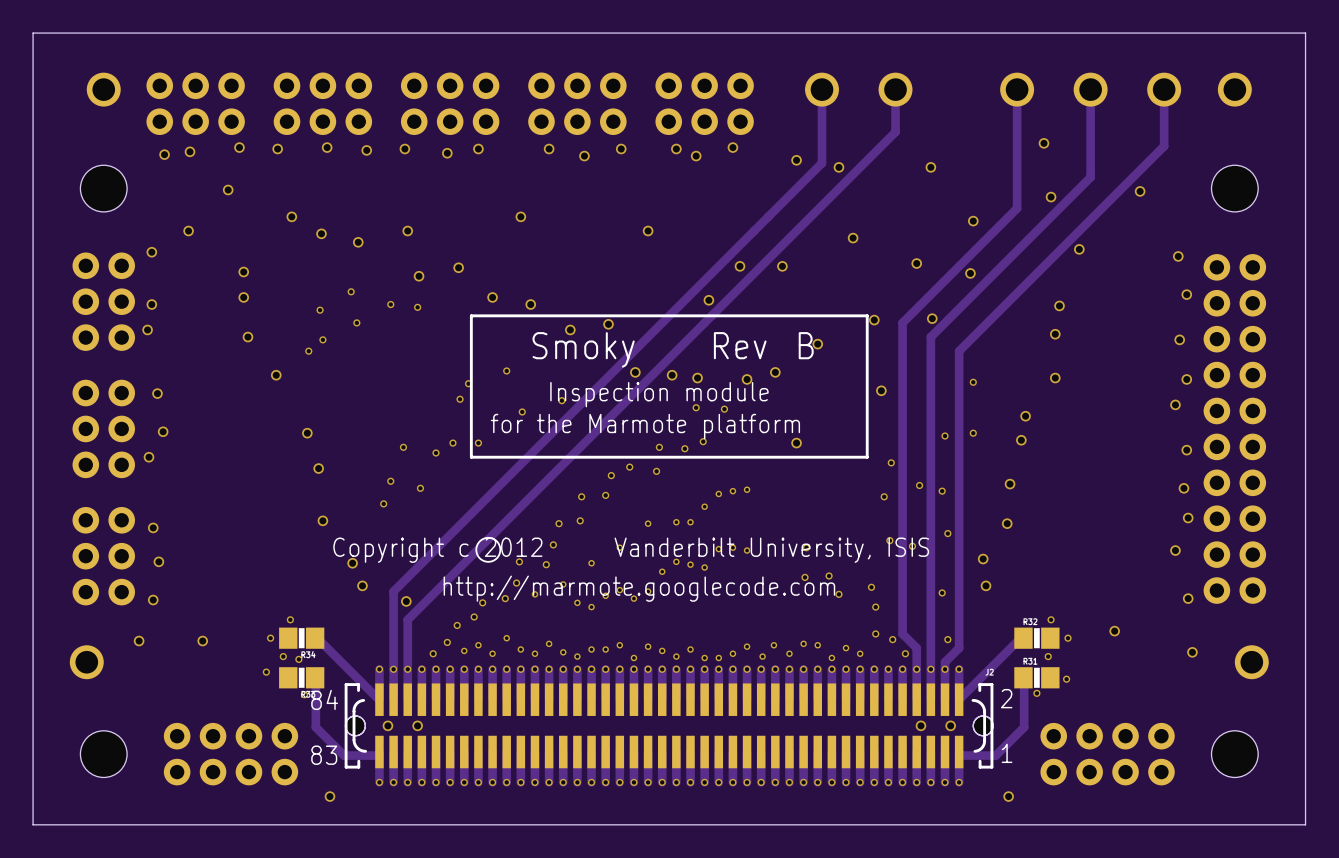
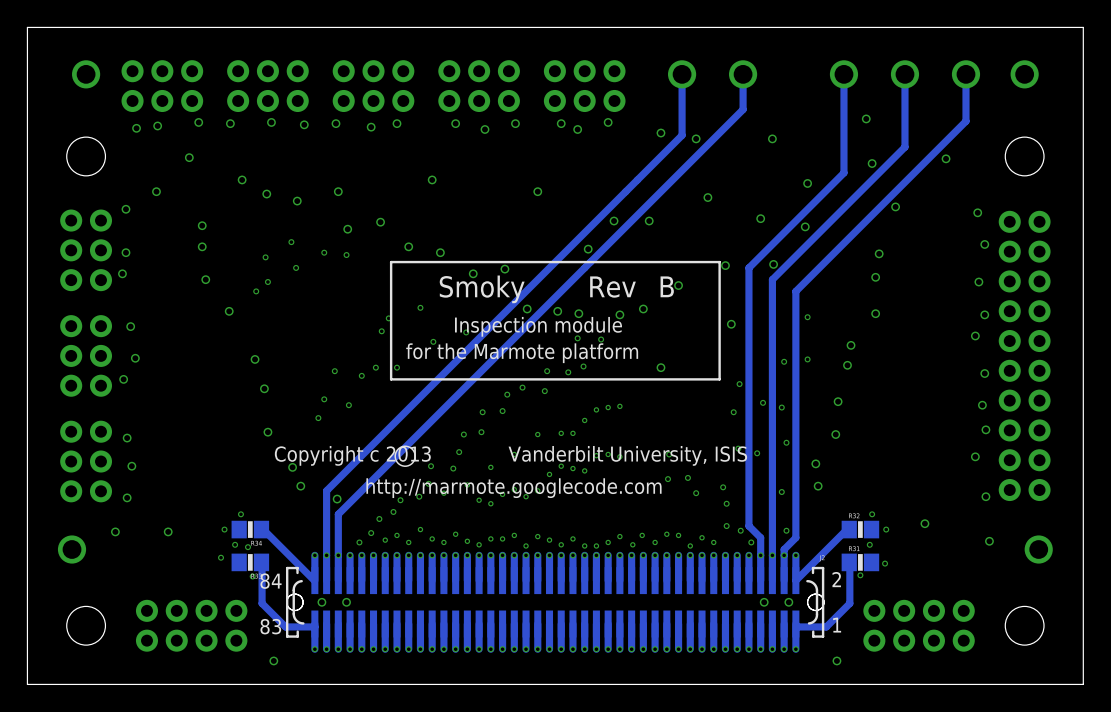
text: Copyright c 2012 (437, 550) -> Copyright c 2013 (352, 455)

